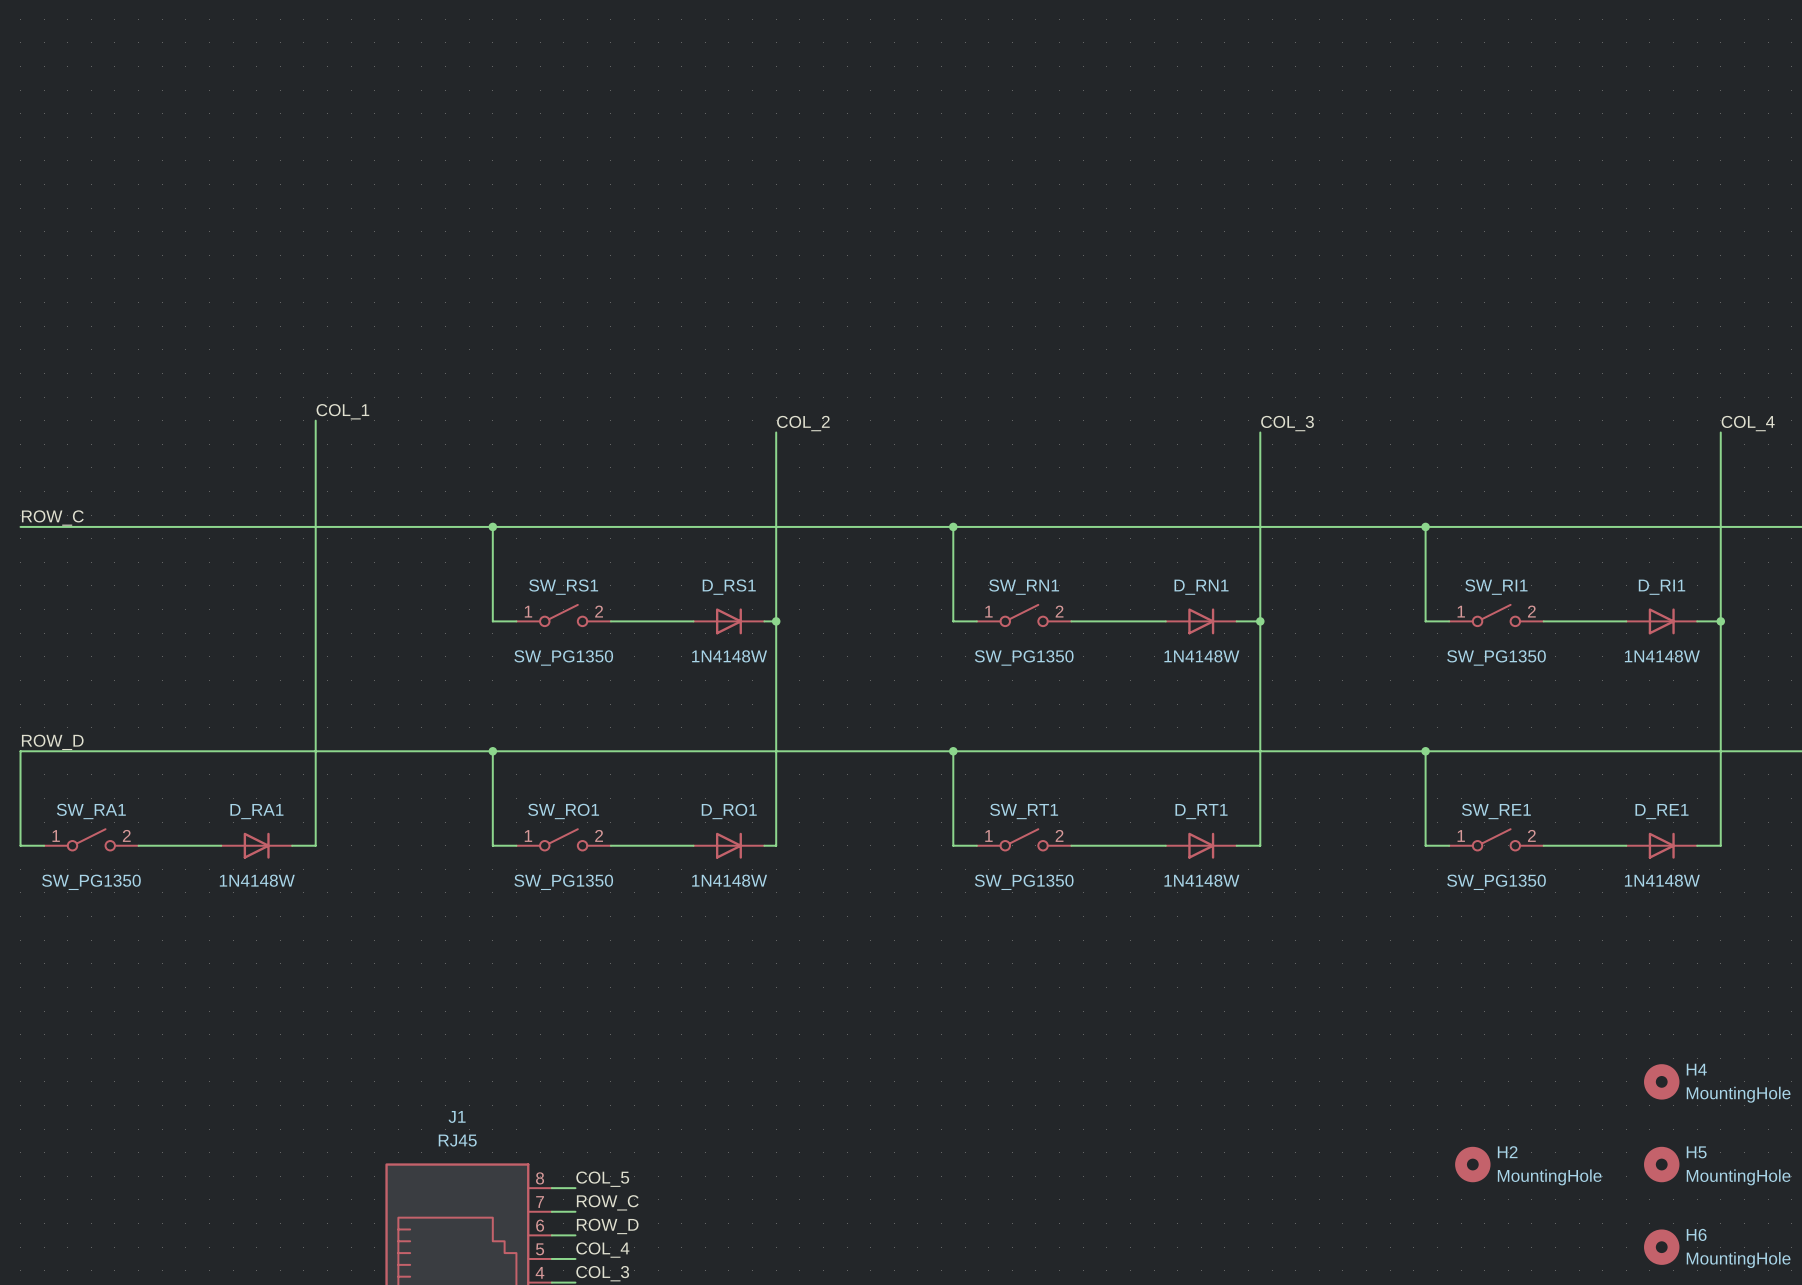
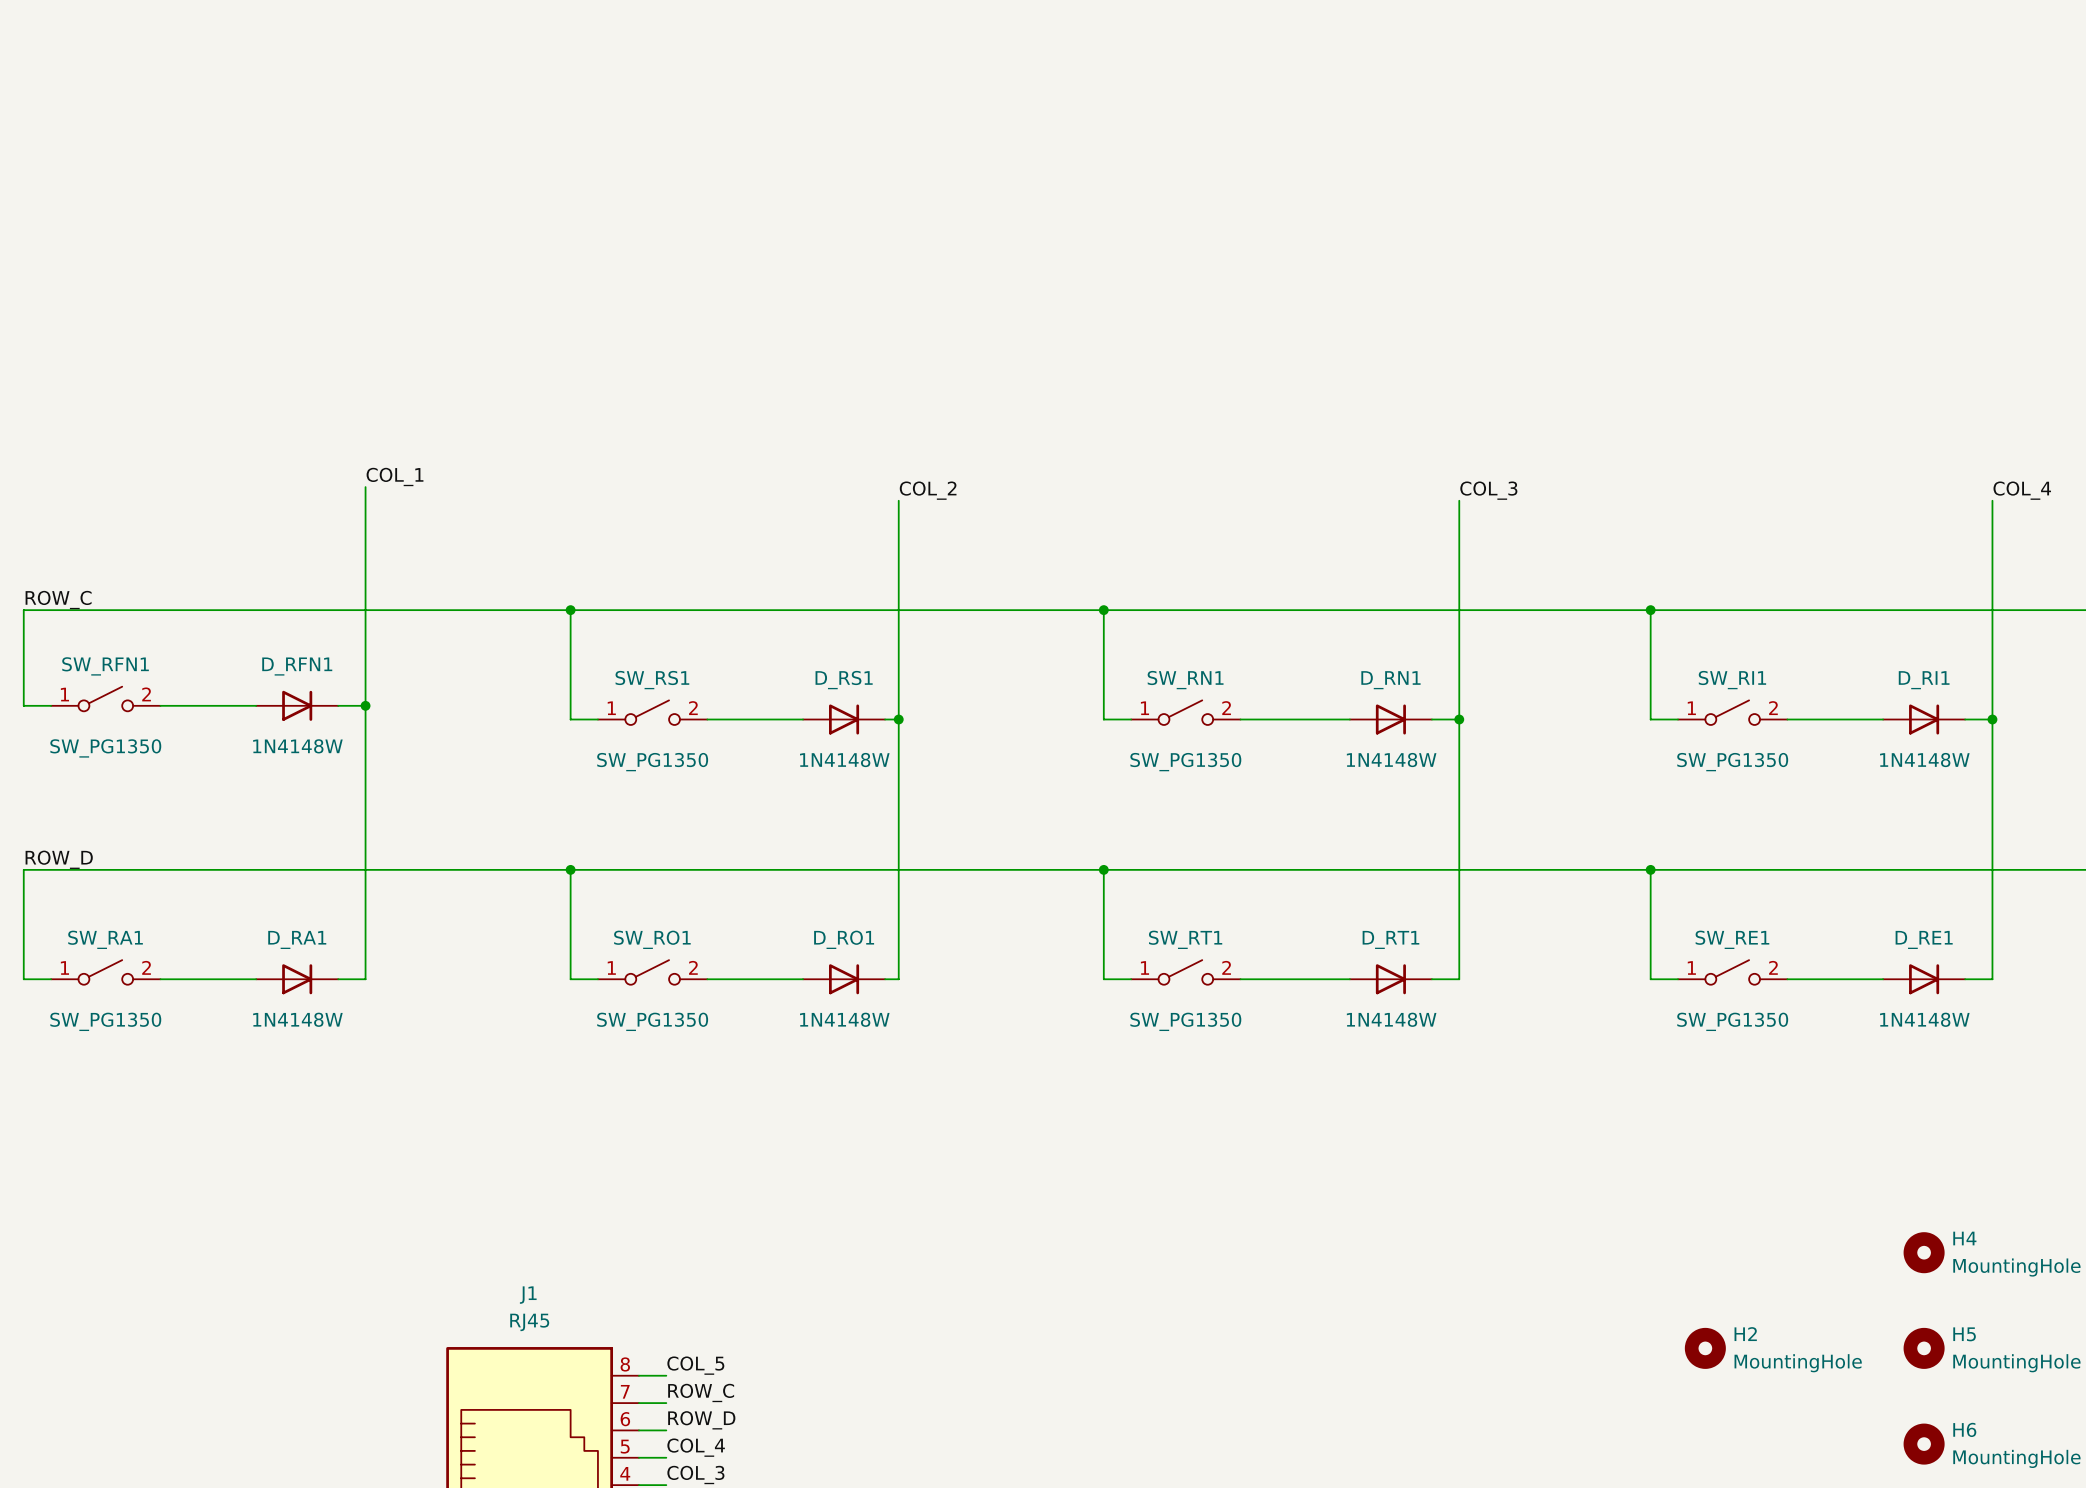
wire: none -> (23, 610) (23, 705) (51, 705)
SW_RFN1: none -> SW_PG1350 (105, 699)
wire: none -> (160, 705) (256, 705)
D_RFN1: none -> 1N4148W (297, 705)
wire: none -> (338, 705) (365, 705)
junction: none -> (365, 705)

